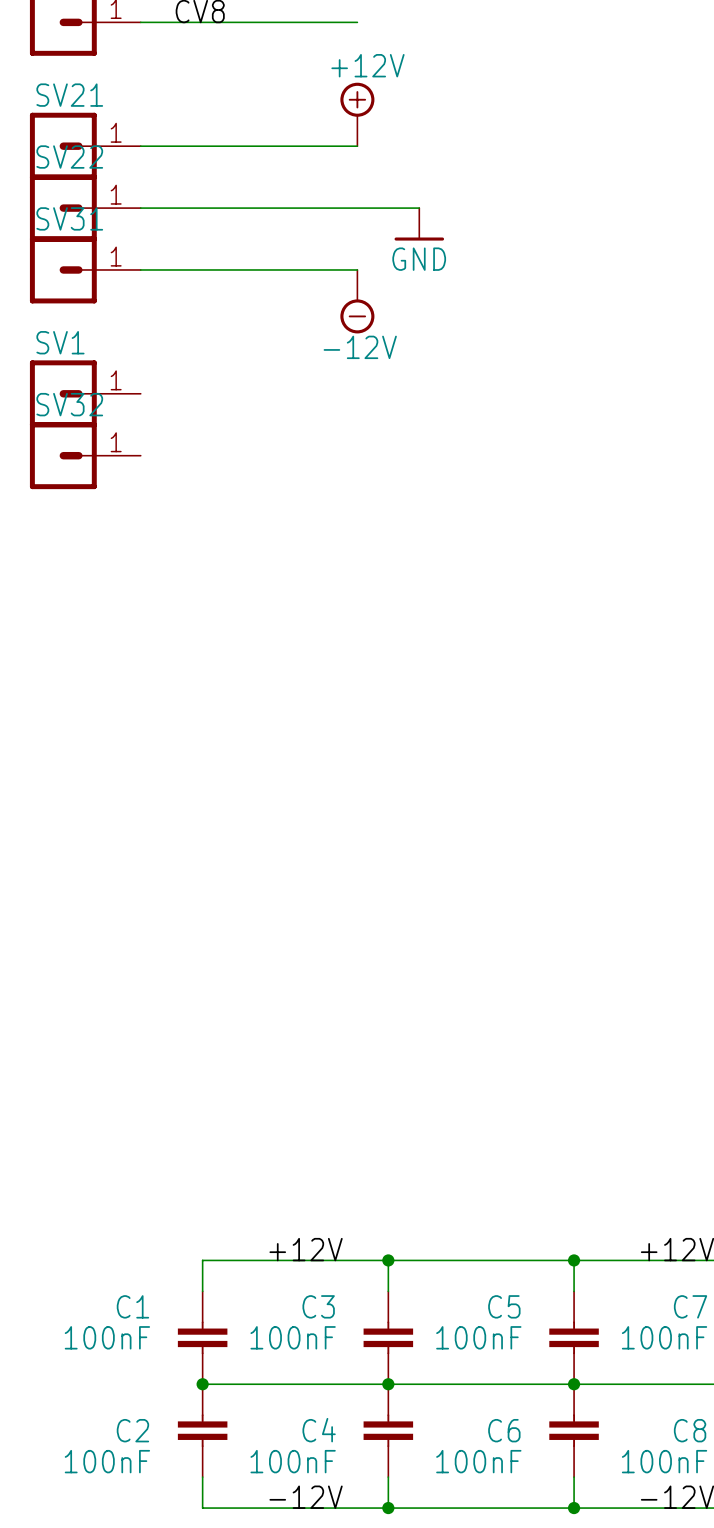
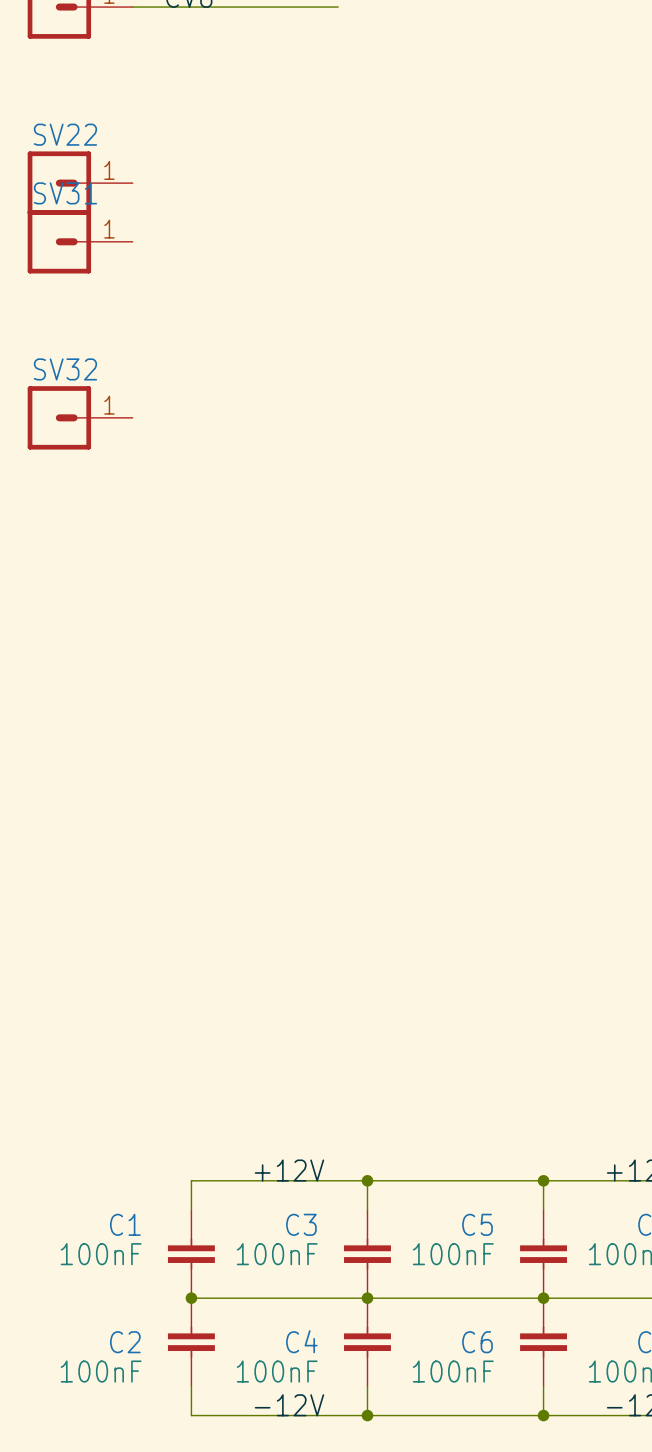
power symbol: +12V (357, 114) -> none
SV21: (85, 146) -> none
wire: (140, 146) (357, 146) -> none
wire: (140, 208) (419, 208) -> none
power symbol: GND (419, 224) -> none
wire: (140, 269) (357, 269) -> none
power symbol: -12V (357, 301) -> none
SV1: (85, 393) -> none

